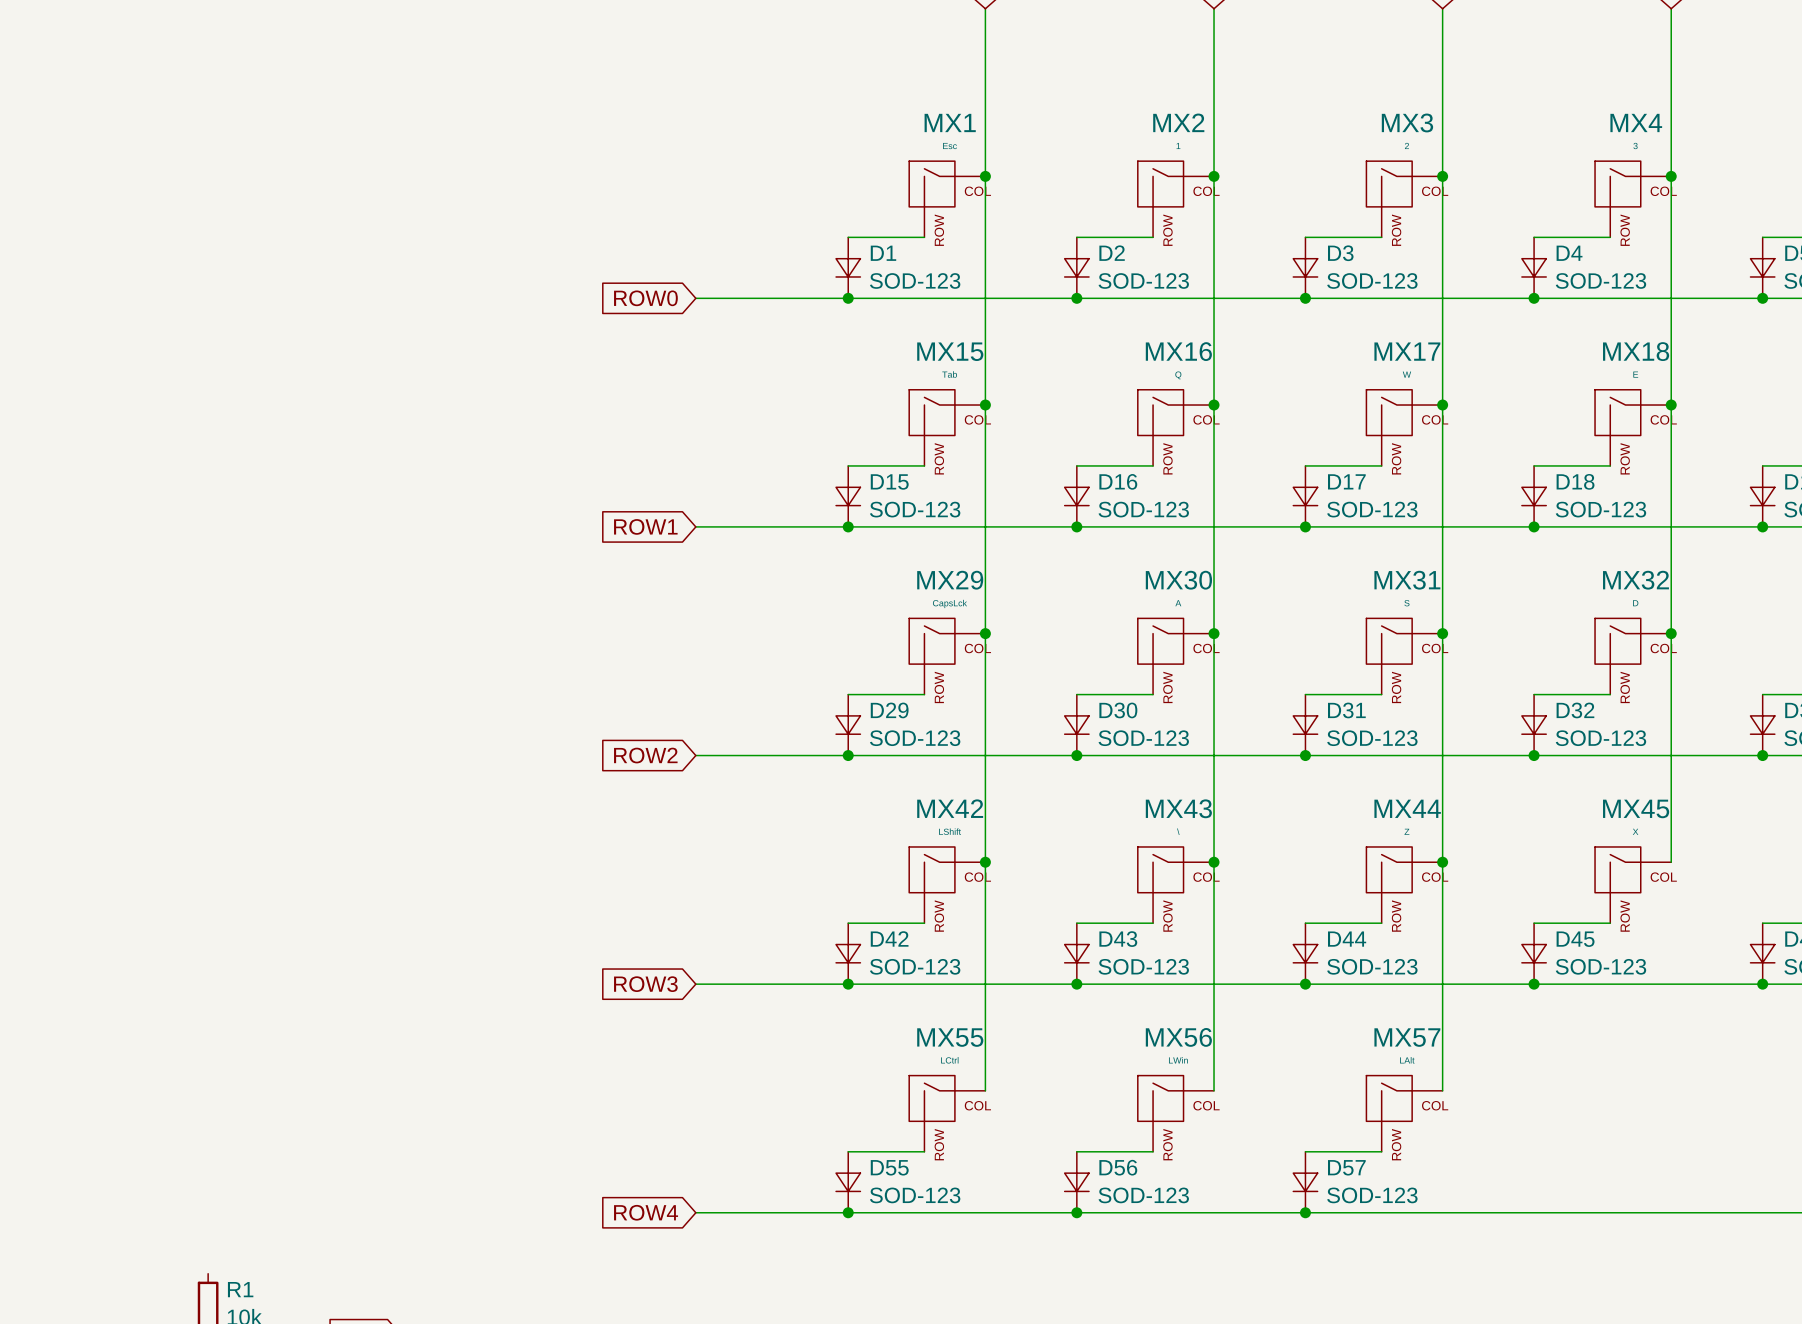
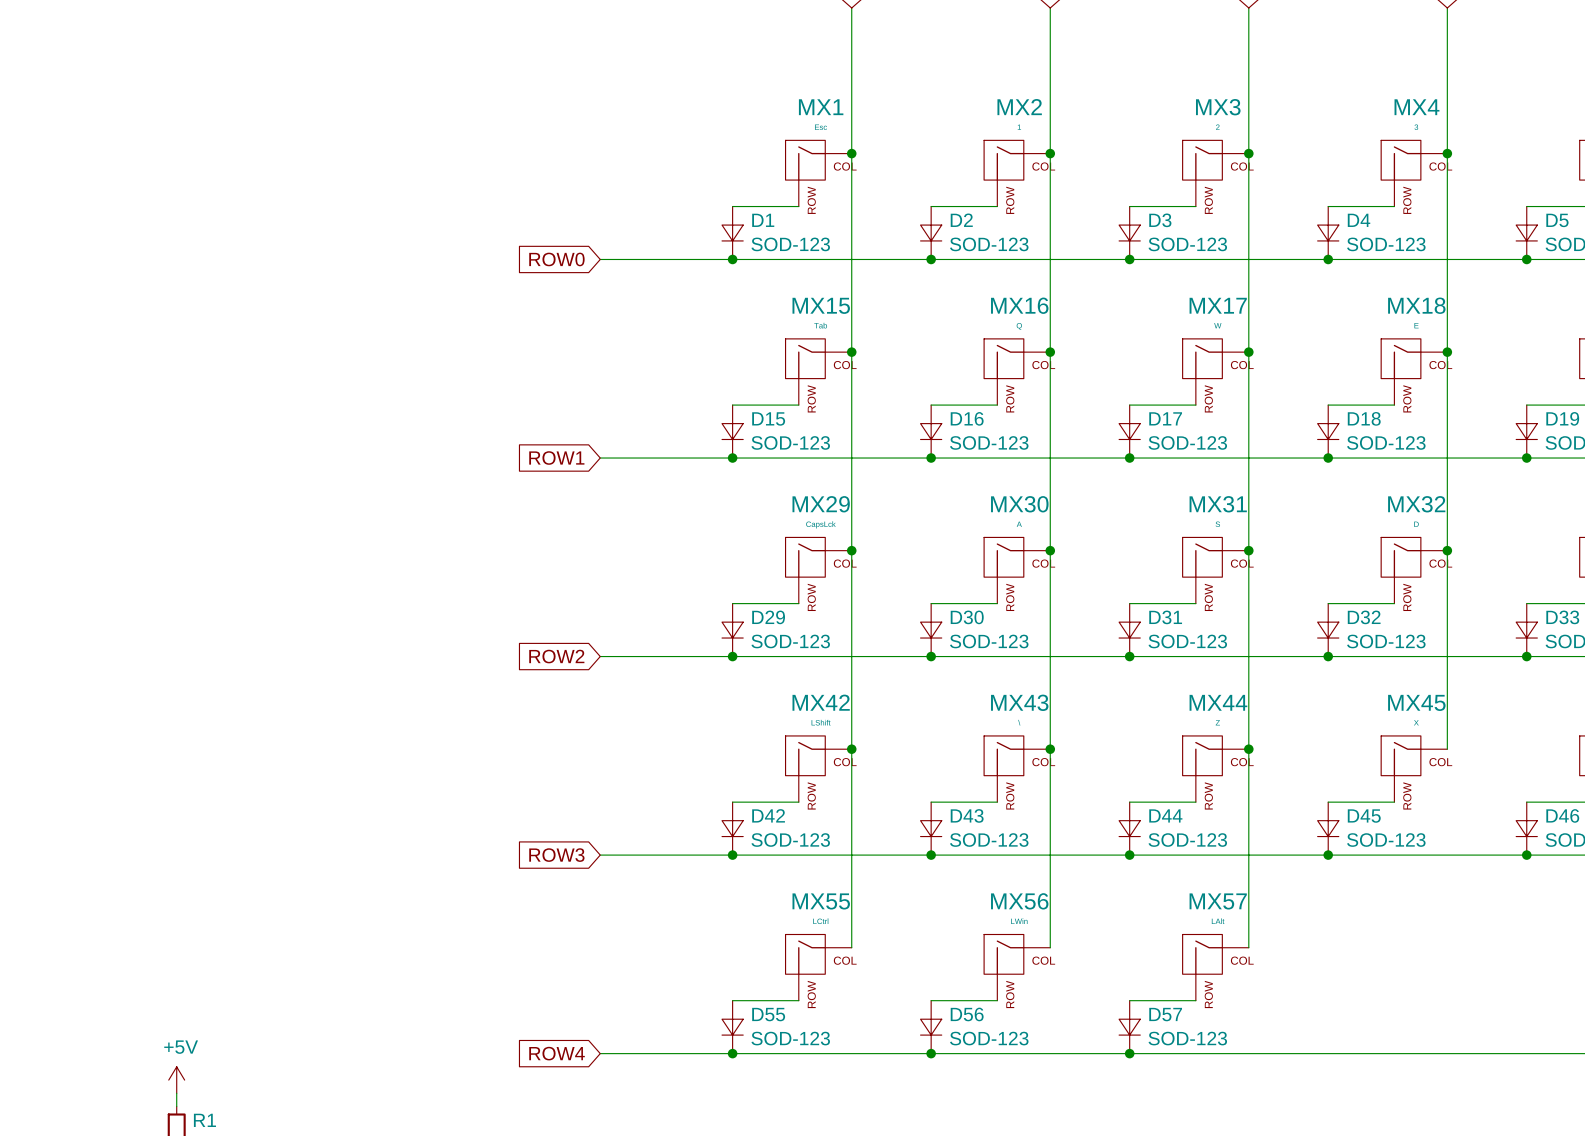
power symbol: none -> +5V (176, 1080)
wire: none -> (176, 1093) (176, 1106)

